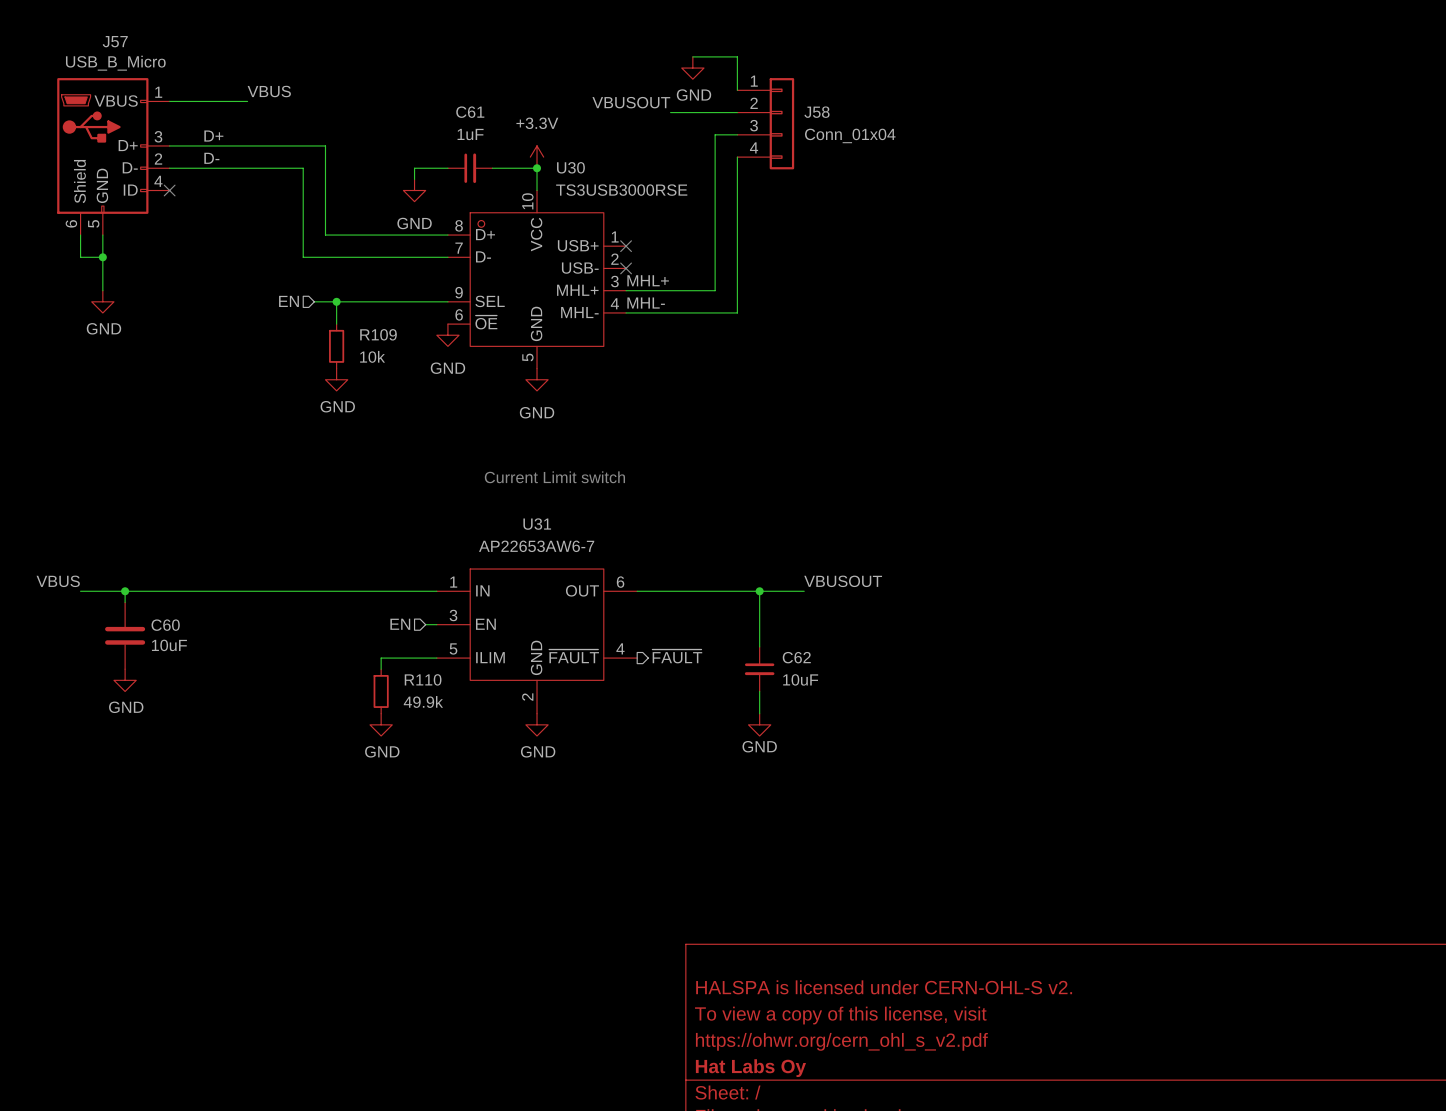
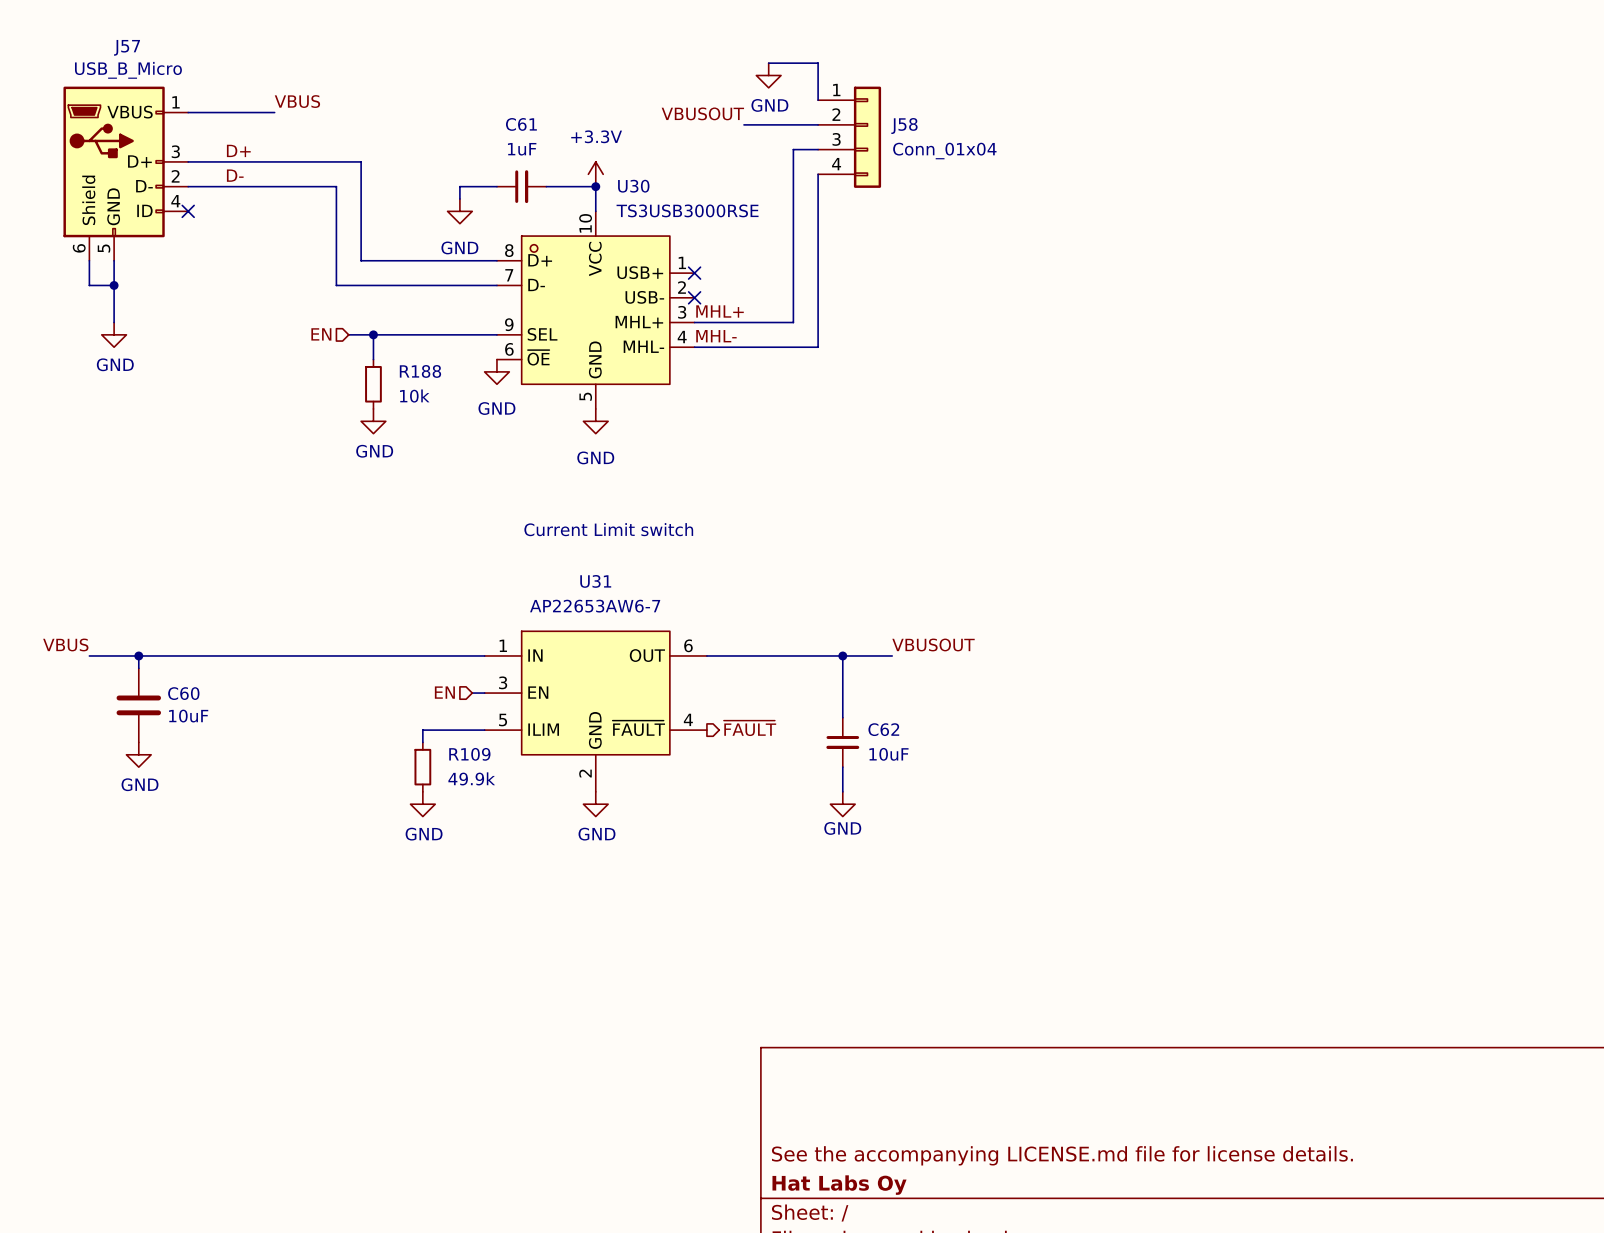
R109 name: R109 (378, 334) -> R188 (420, 371)
R110 name: R110 (423, 679) -> R109 (469, 754)
title block: HALSPA is licensed under CERN-OHL-S v2. (884, 987) -> none
title block: To view a copy of this license, visit (840, 1015) -> none
title block: https://ohwr.org/cern_ohl_s_v2.pdf (841, 1041) -> See the accompanying LICENSE.md file for license details. (1062, 1155)

